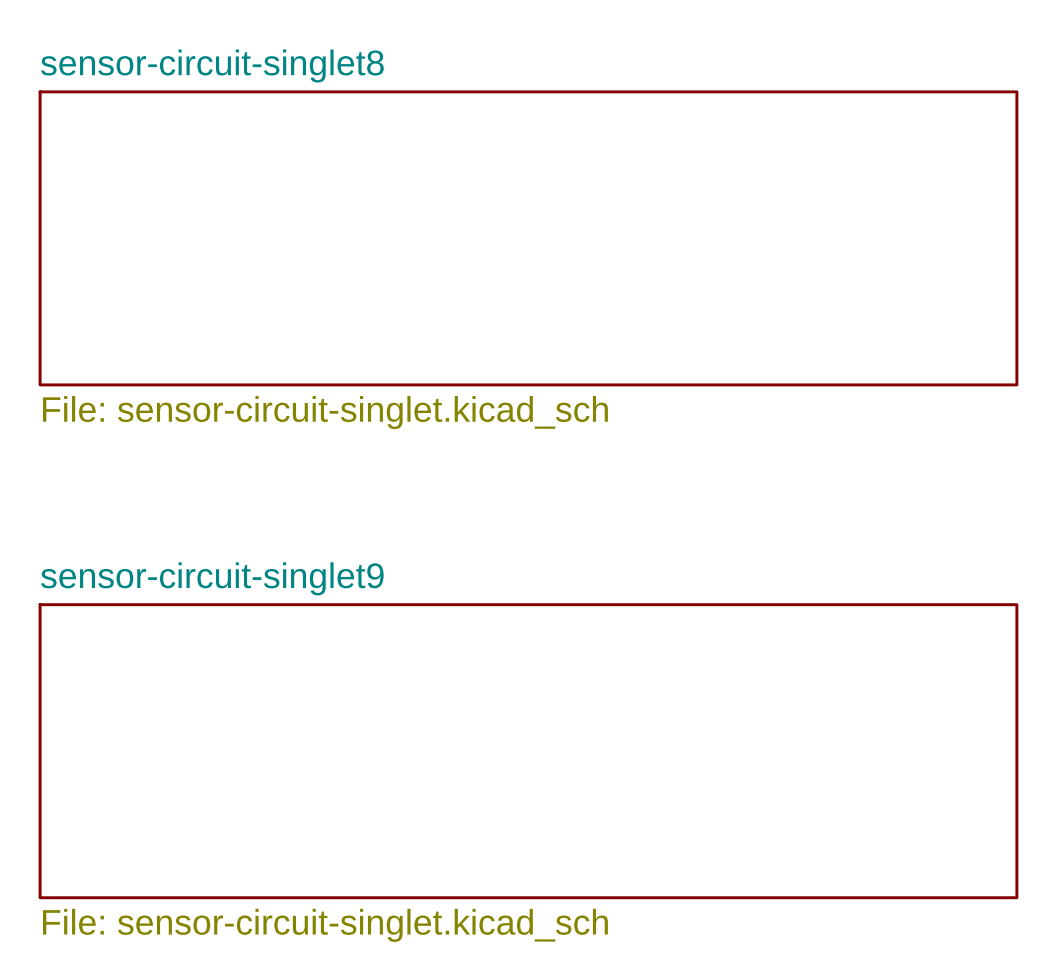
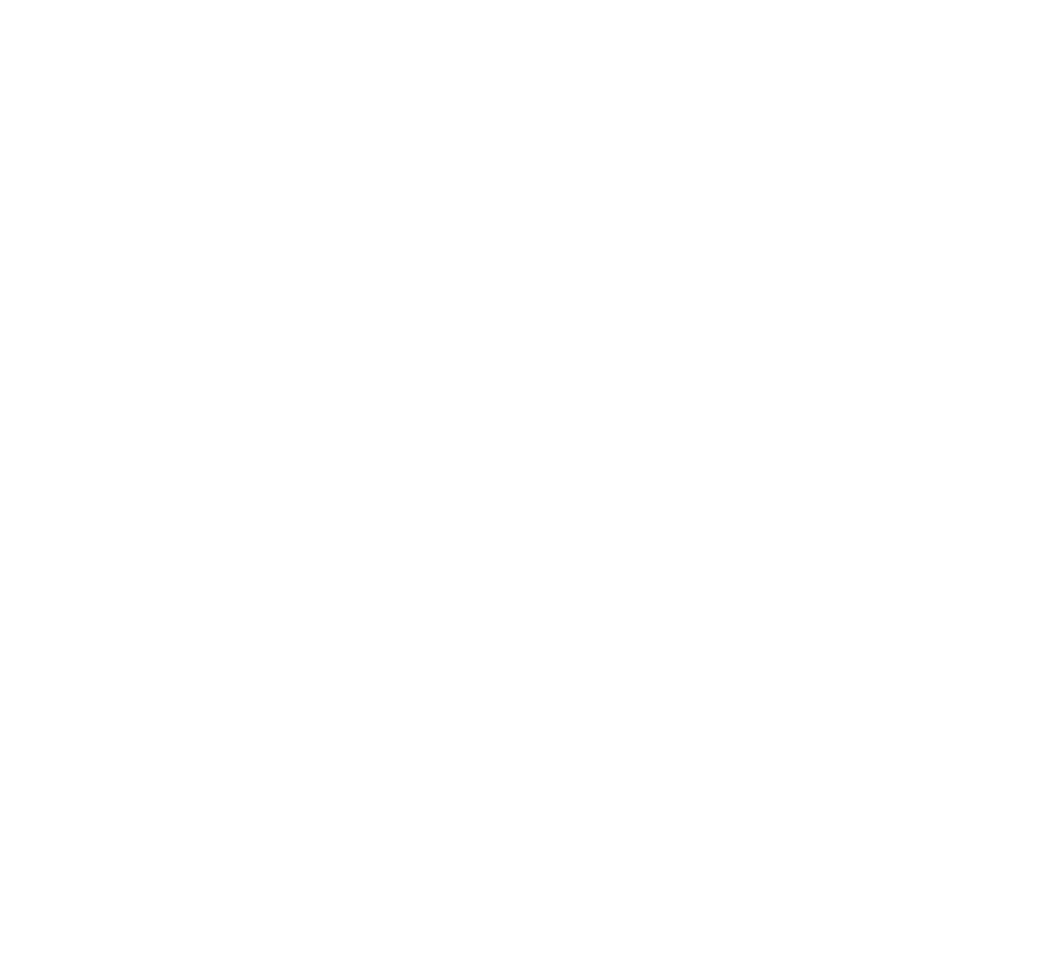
sheet sensor-circuit-singlet8: File: sensor-circuit-singlet.kicad_sch (528, 238) -> none
sheet sensor-circuit-singlet9: File: sensor-circuit-singlet.kicad_sch (528, 751) -> none

